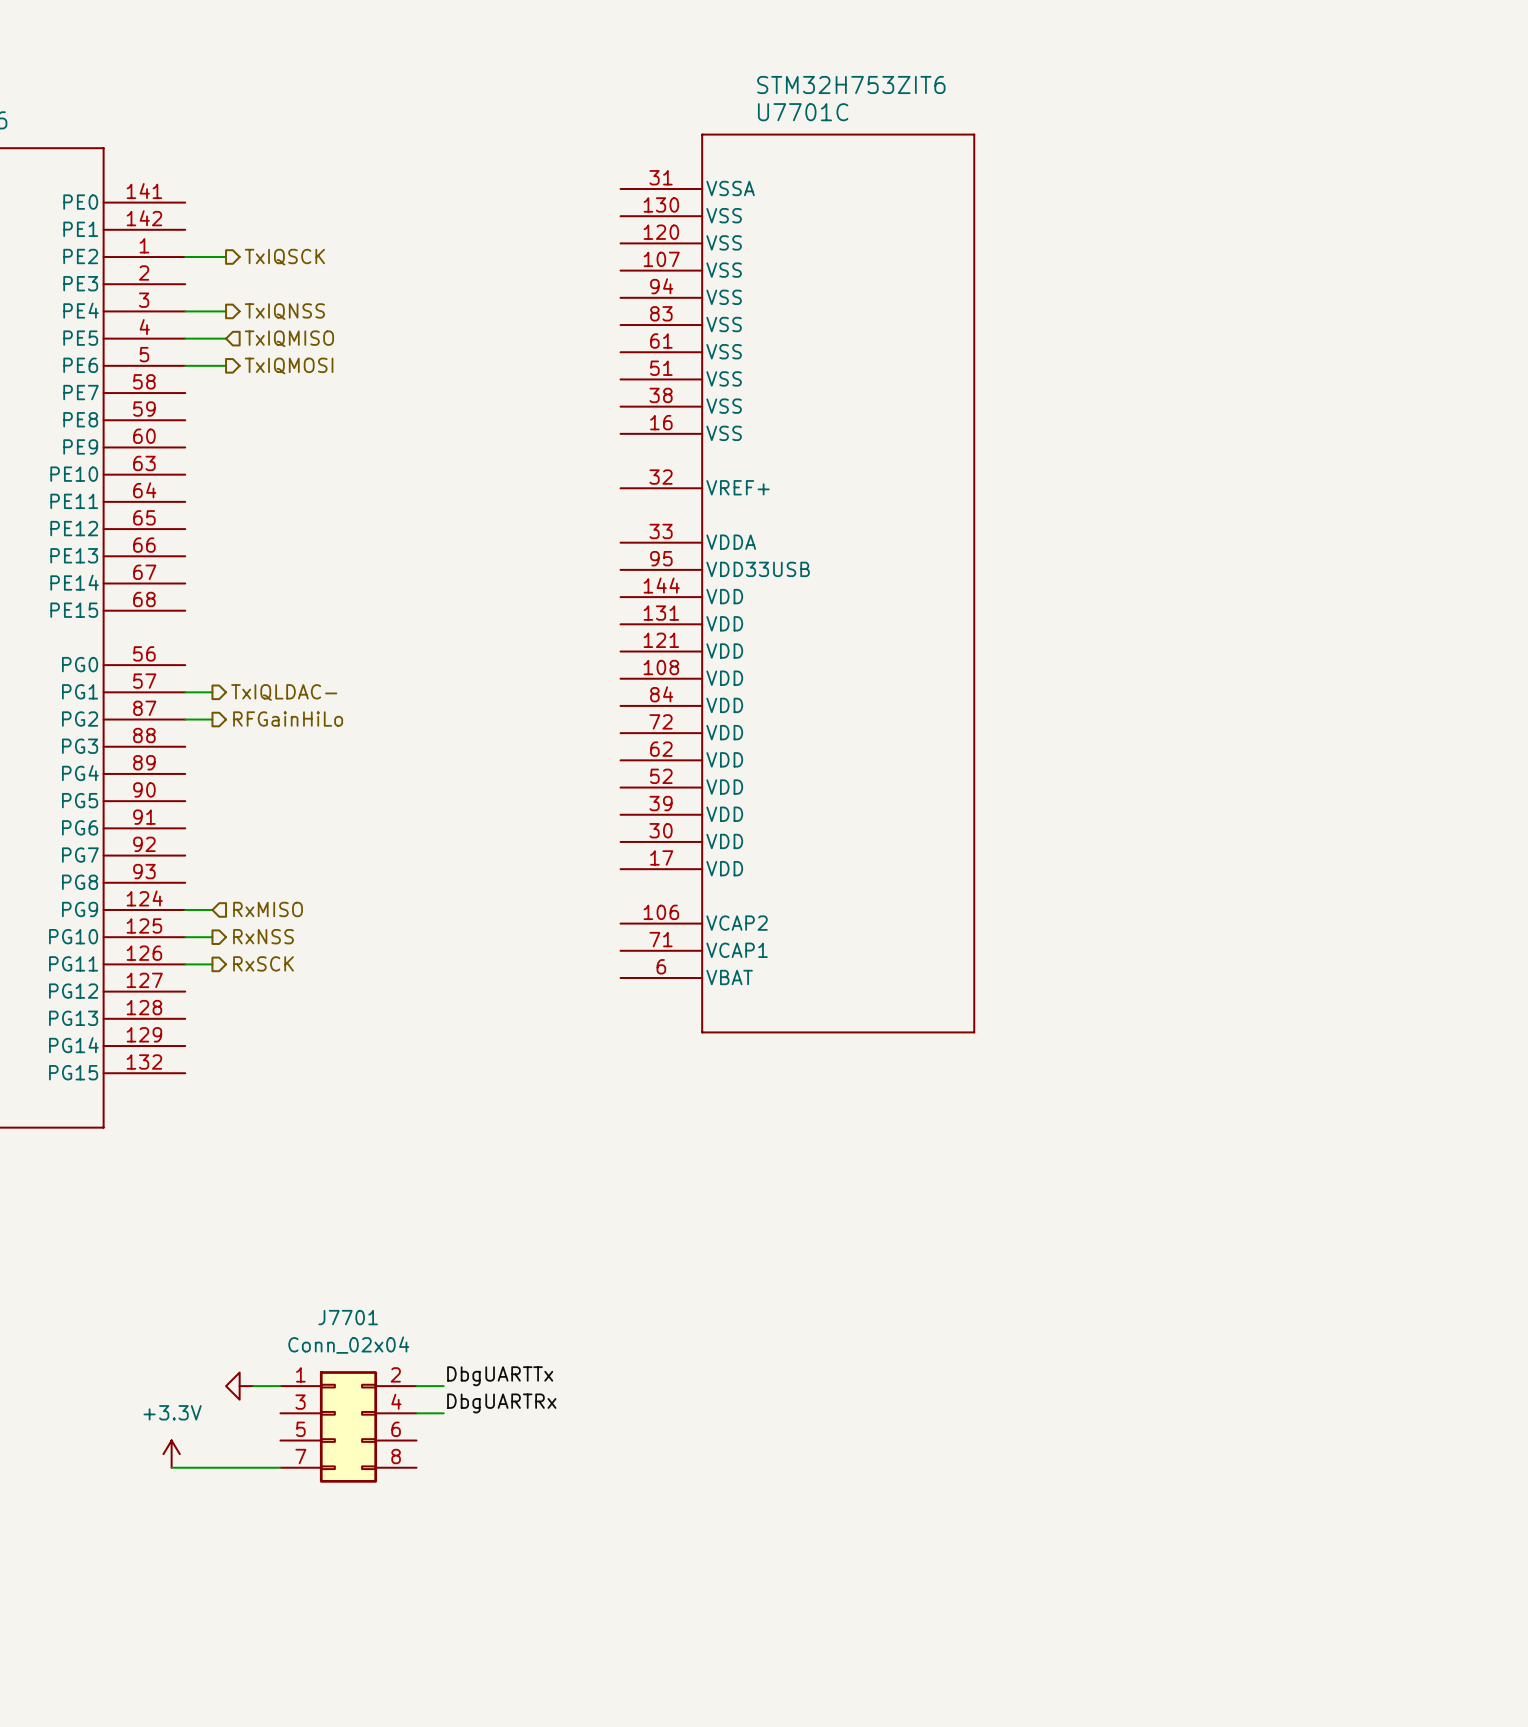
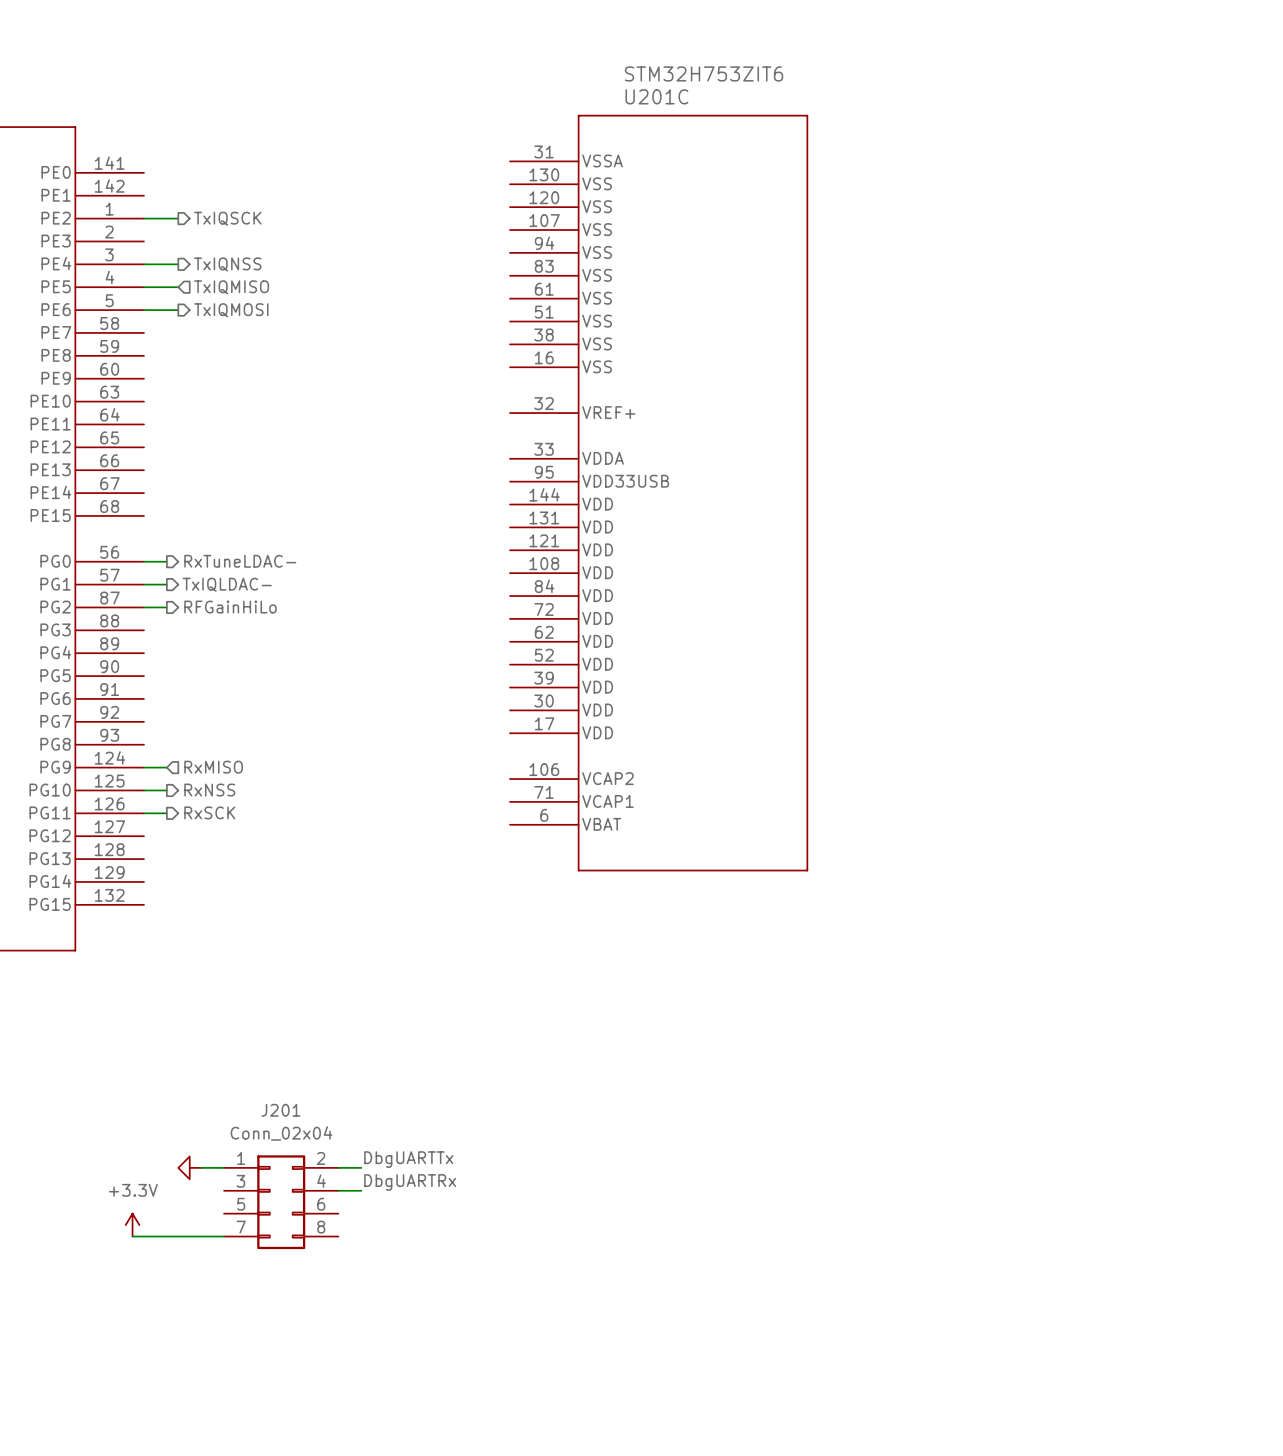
U7701C name: U7701C (803, 112) -> U201C (656, 96)
hierarchical label: none -> RxTuneLDAC- (240, 561)
wire: none -> (143, 561) (166, 561)
J7701 name: J7701 (348, 1317) -> J201 (280, 1110)

